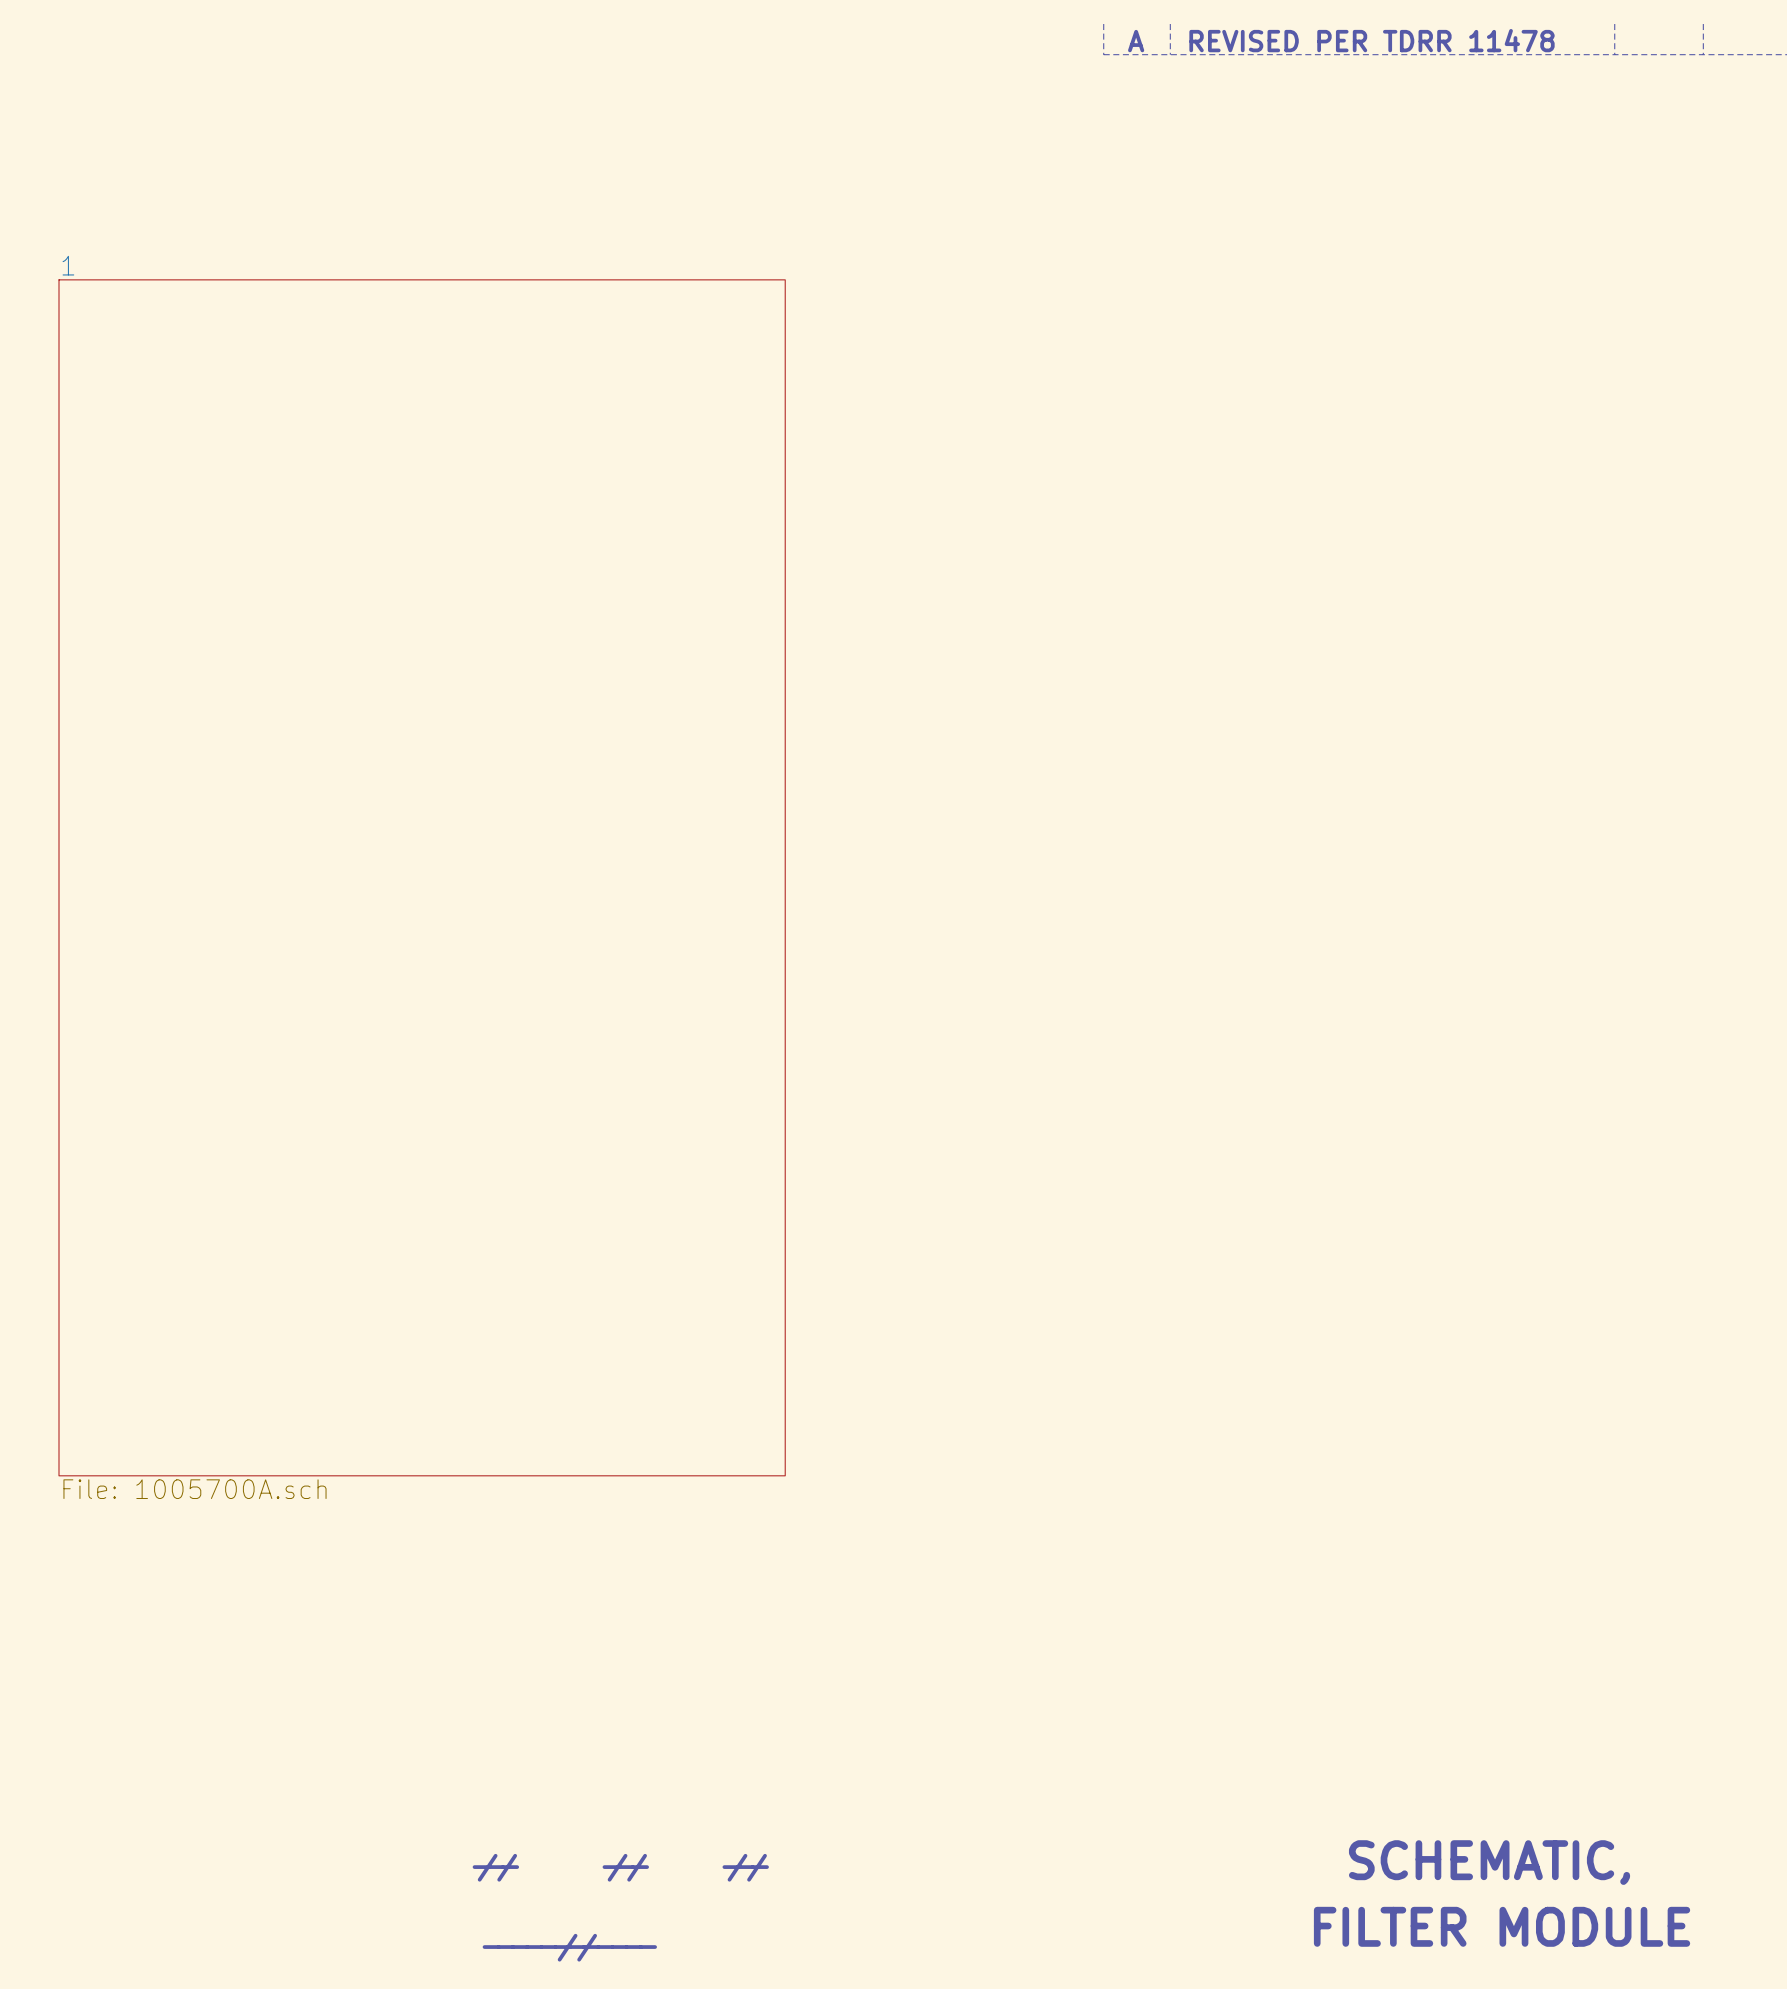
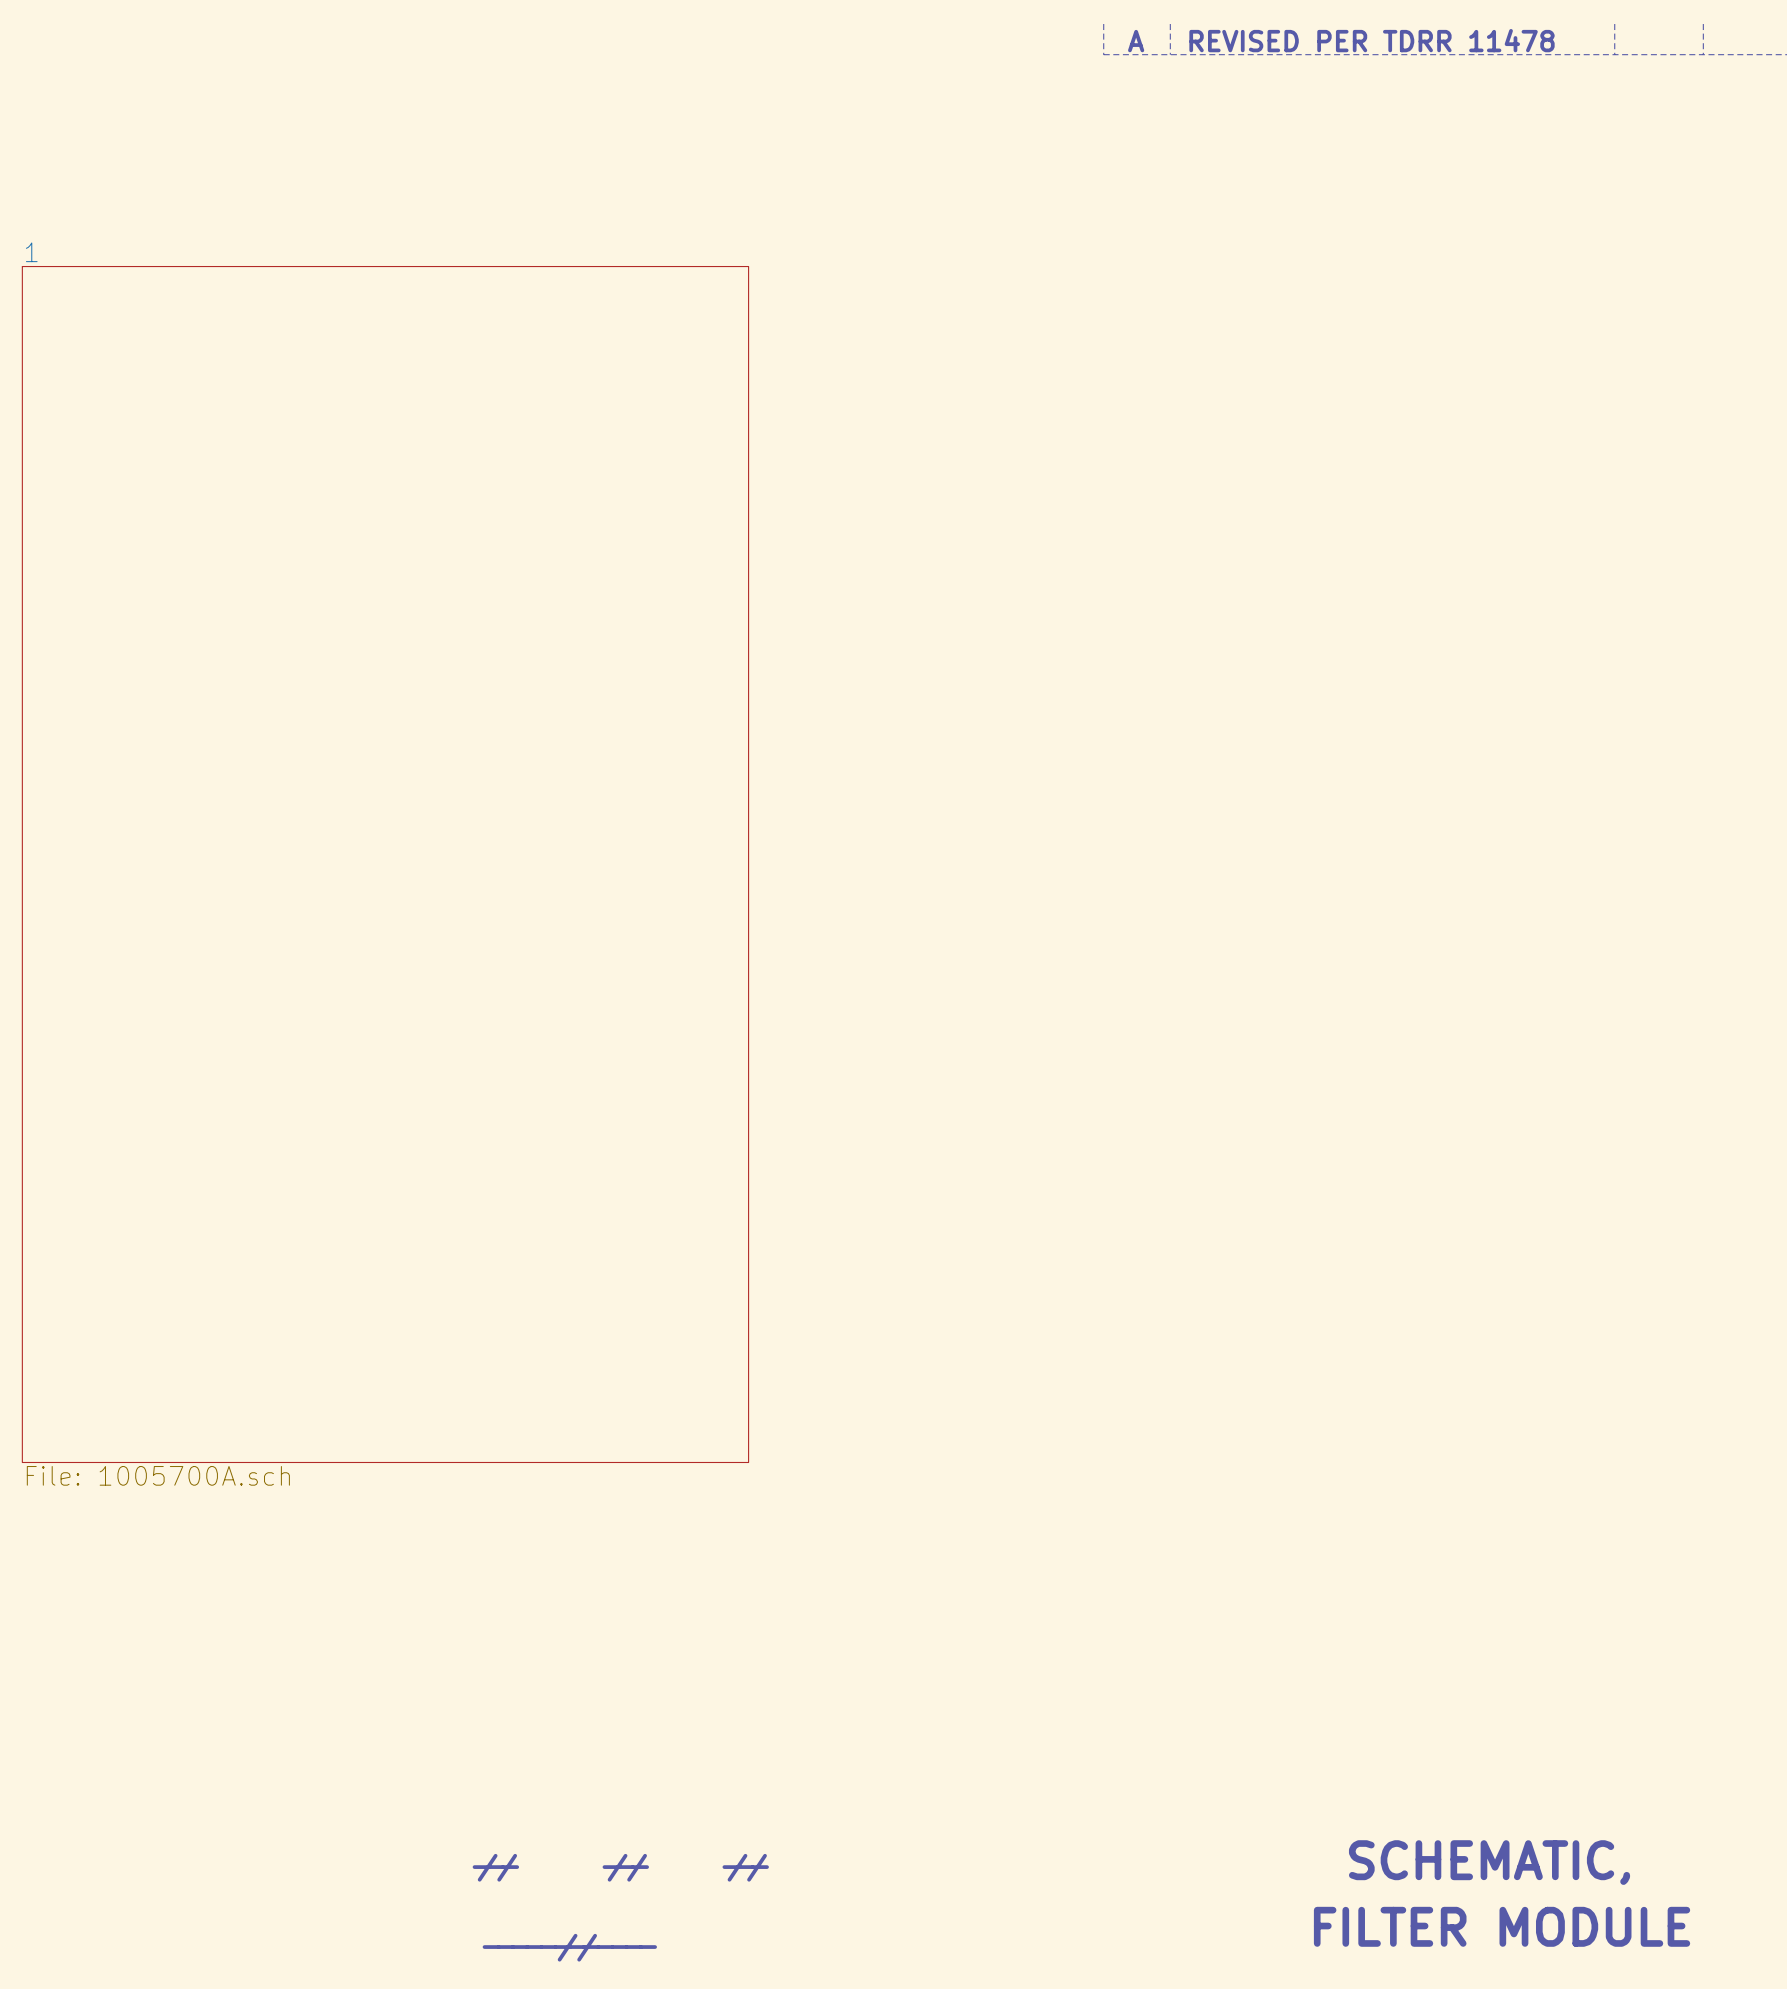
sheet 1 position: (422, 877) -> (385, 864)

